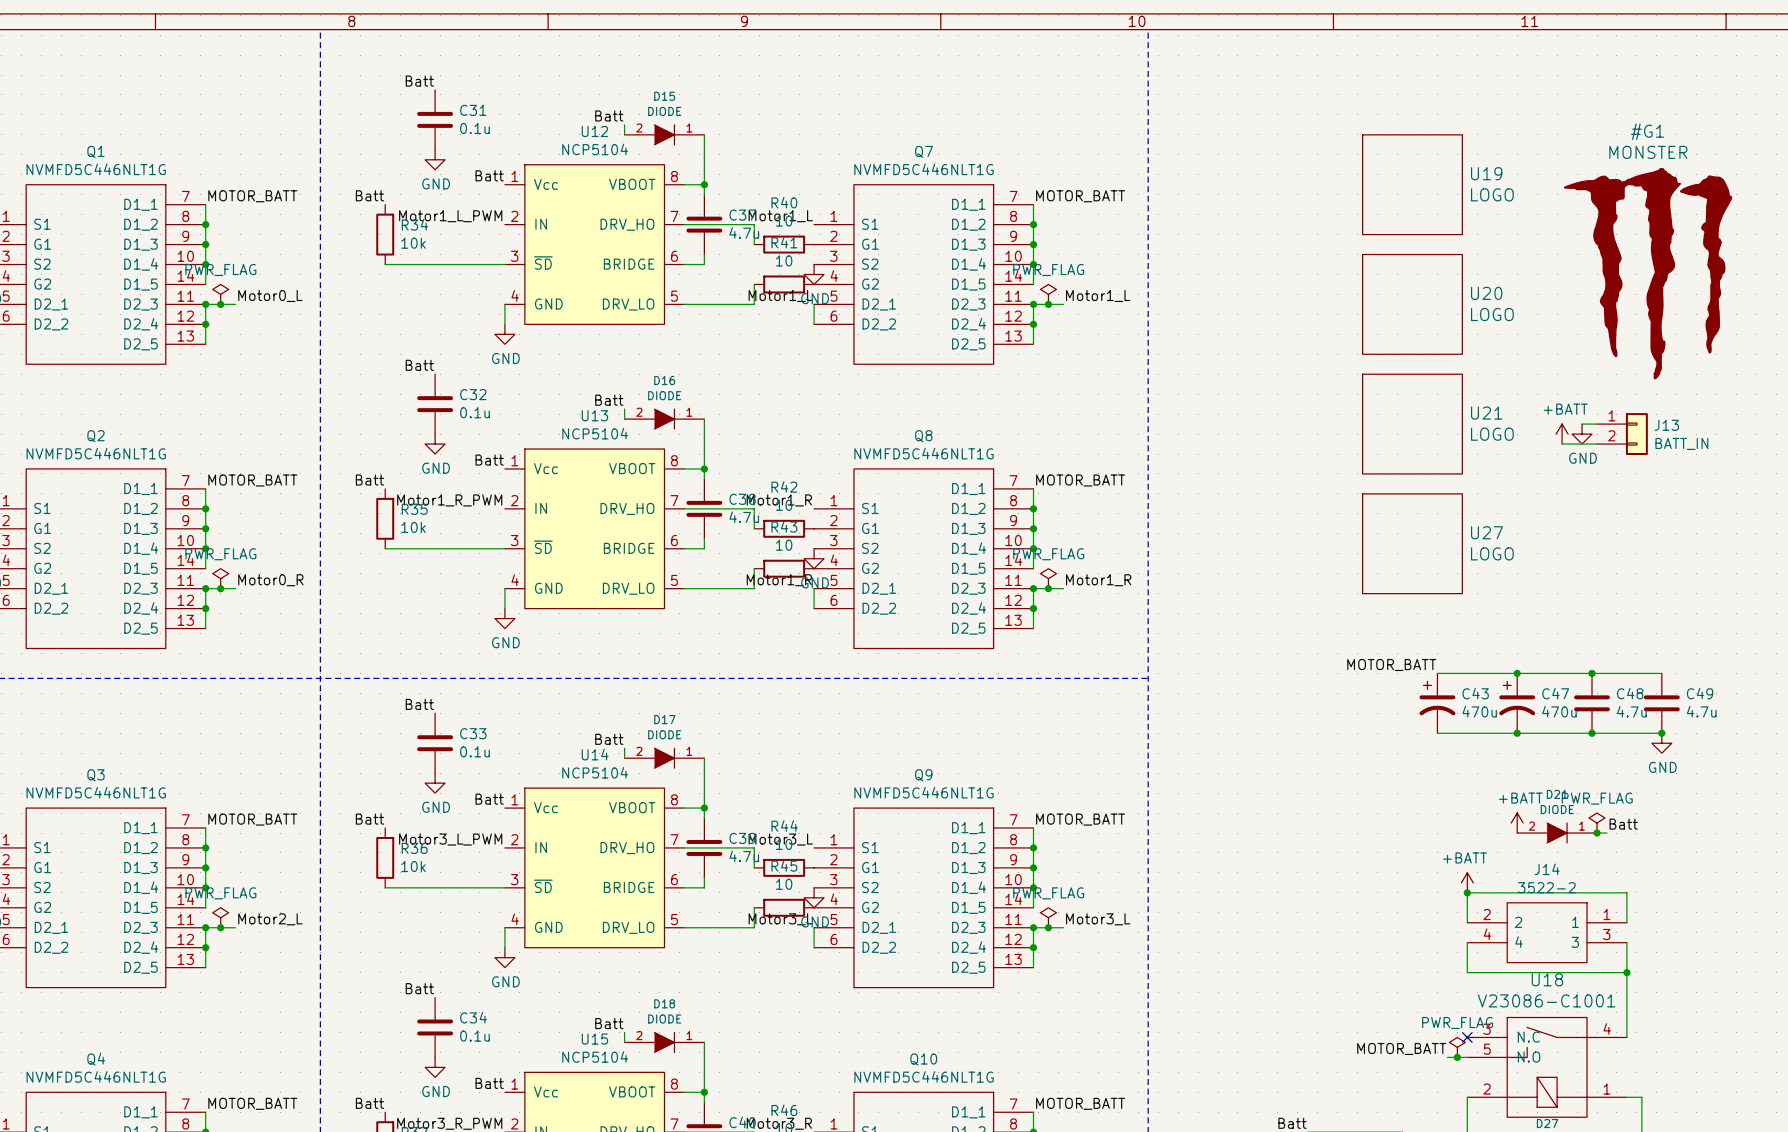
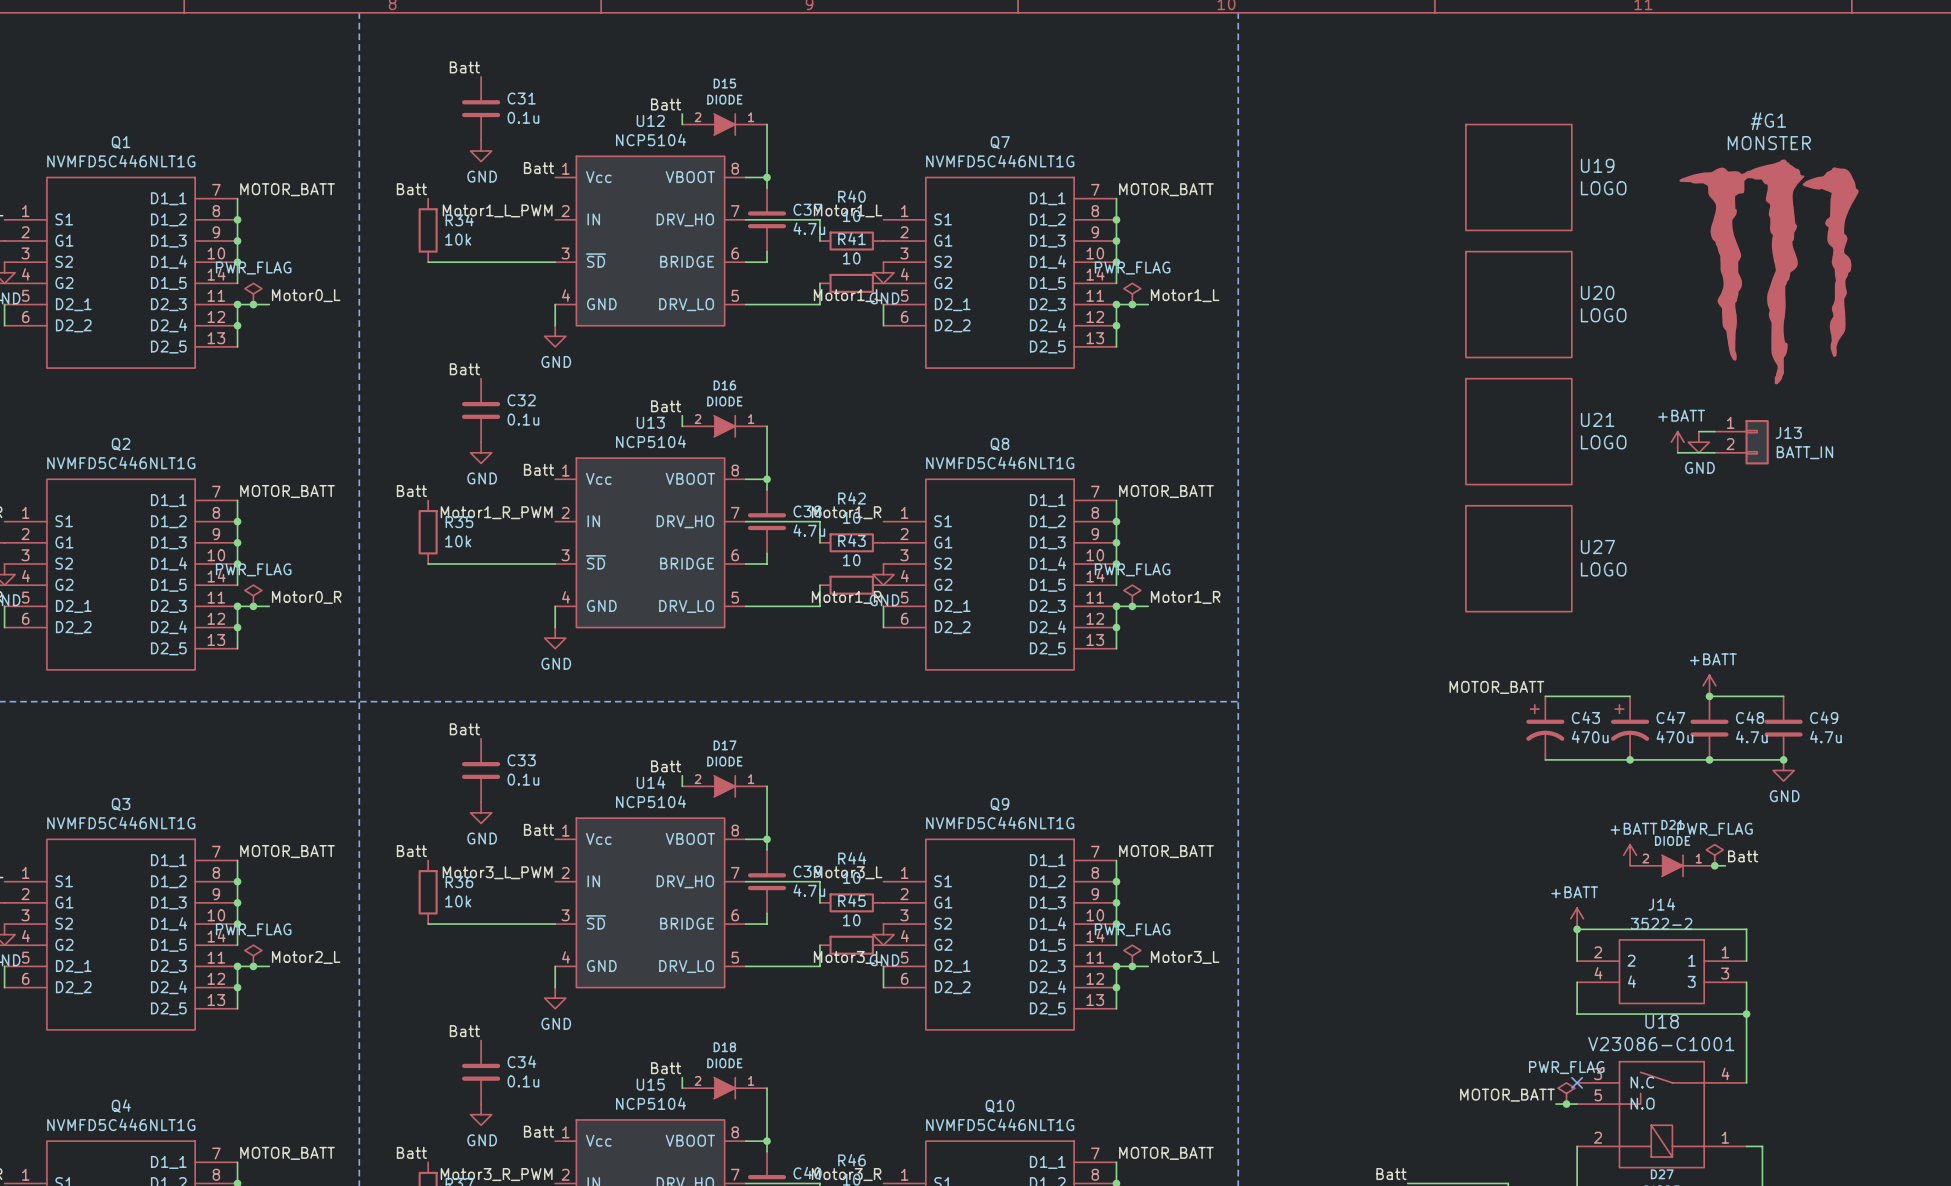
power symbol: none -> +BATT (1709, 685)
wire: (1517, 673) (1592, 673) -> none
junction: (1517, 673) -> none

